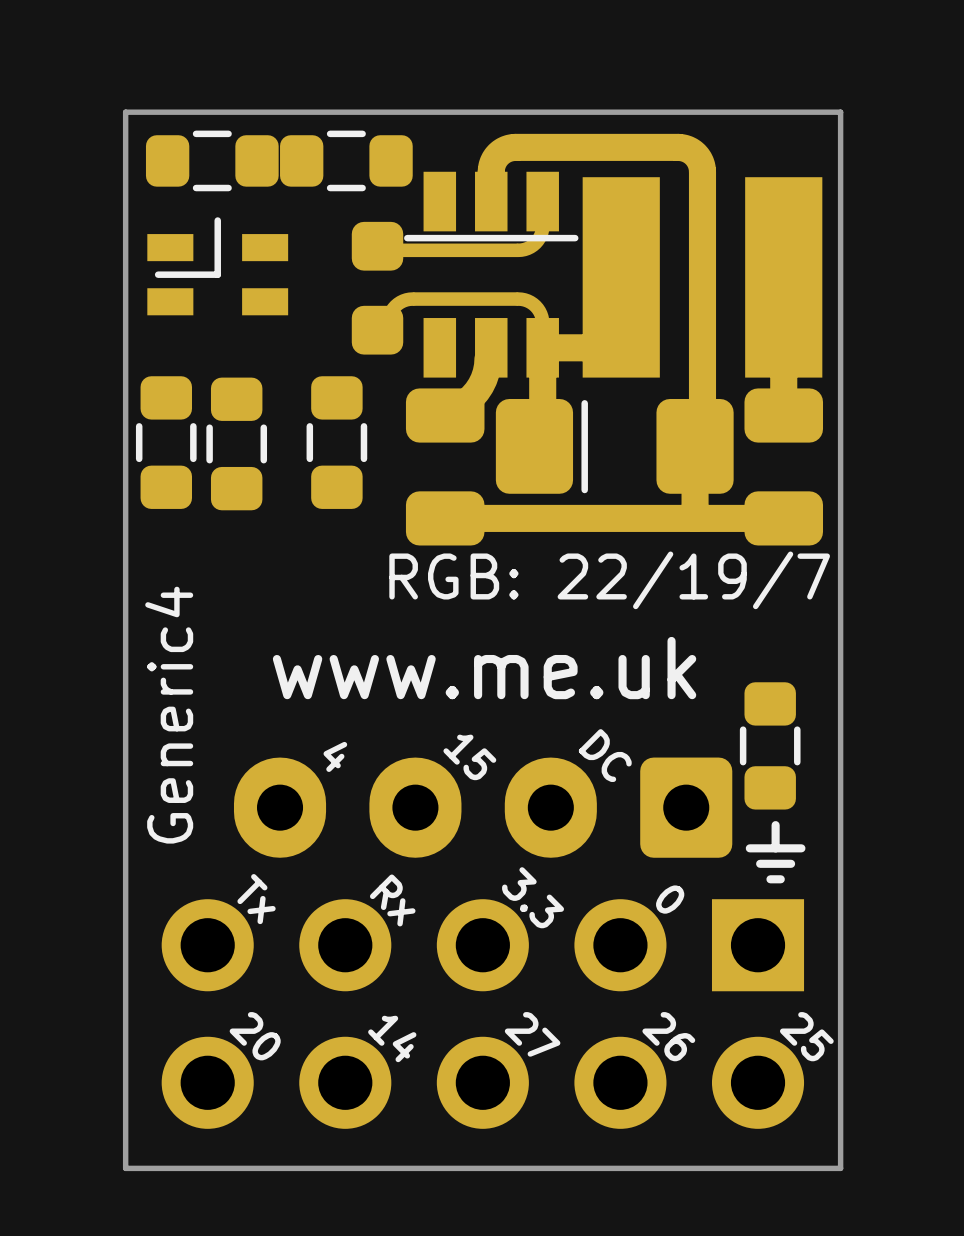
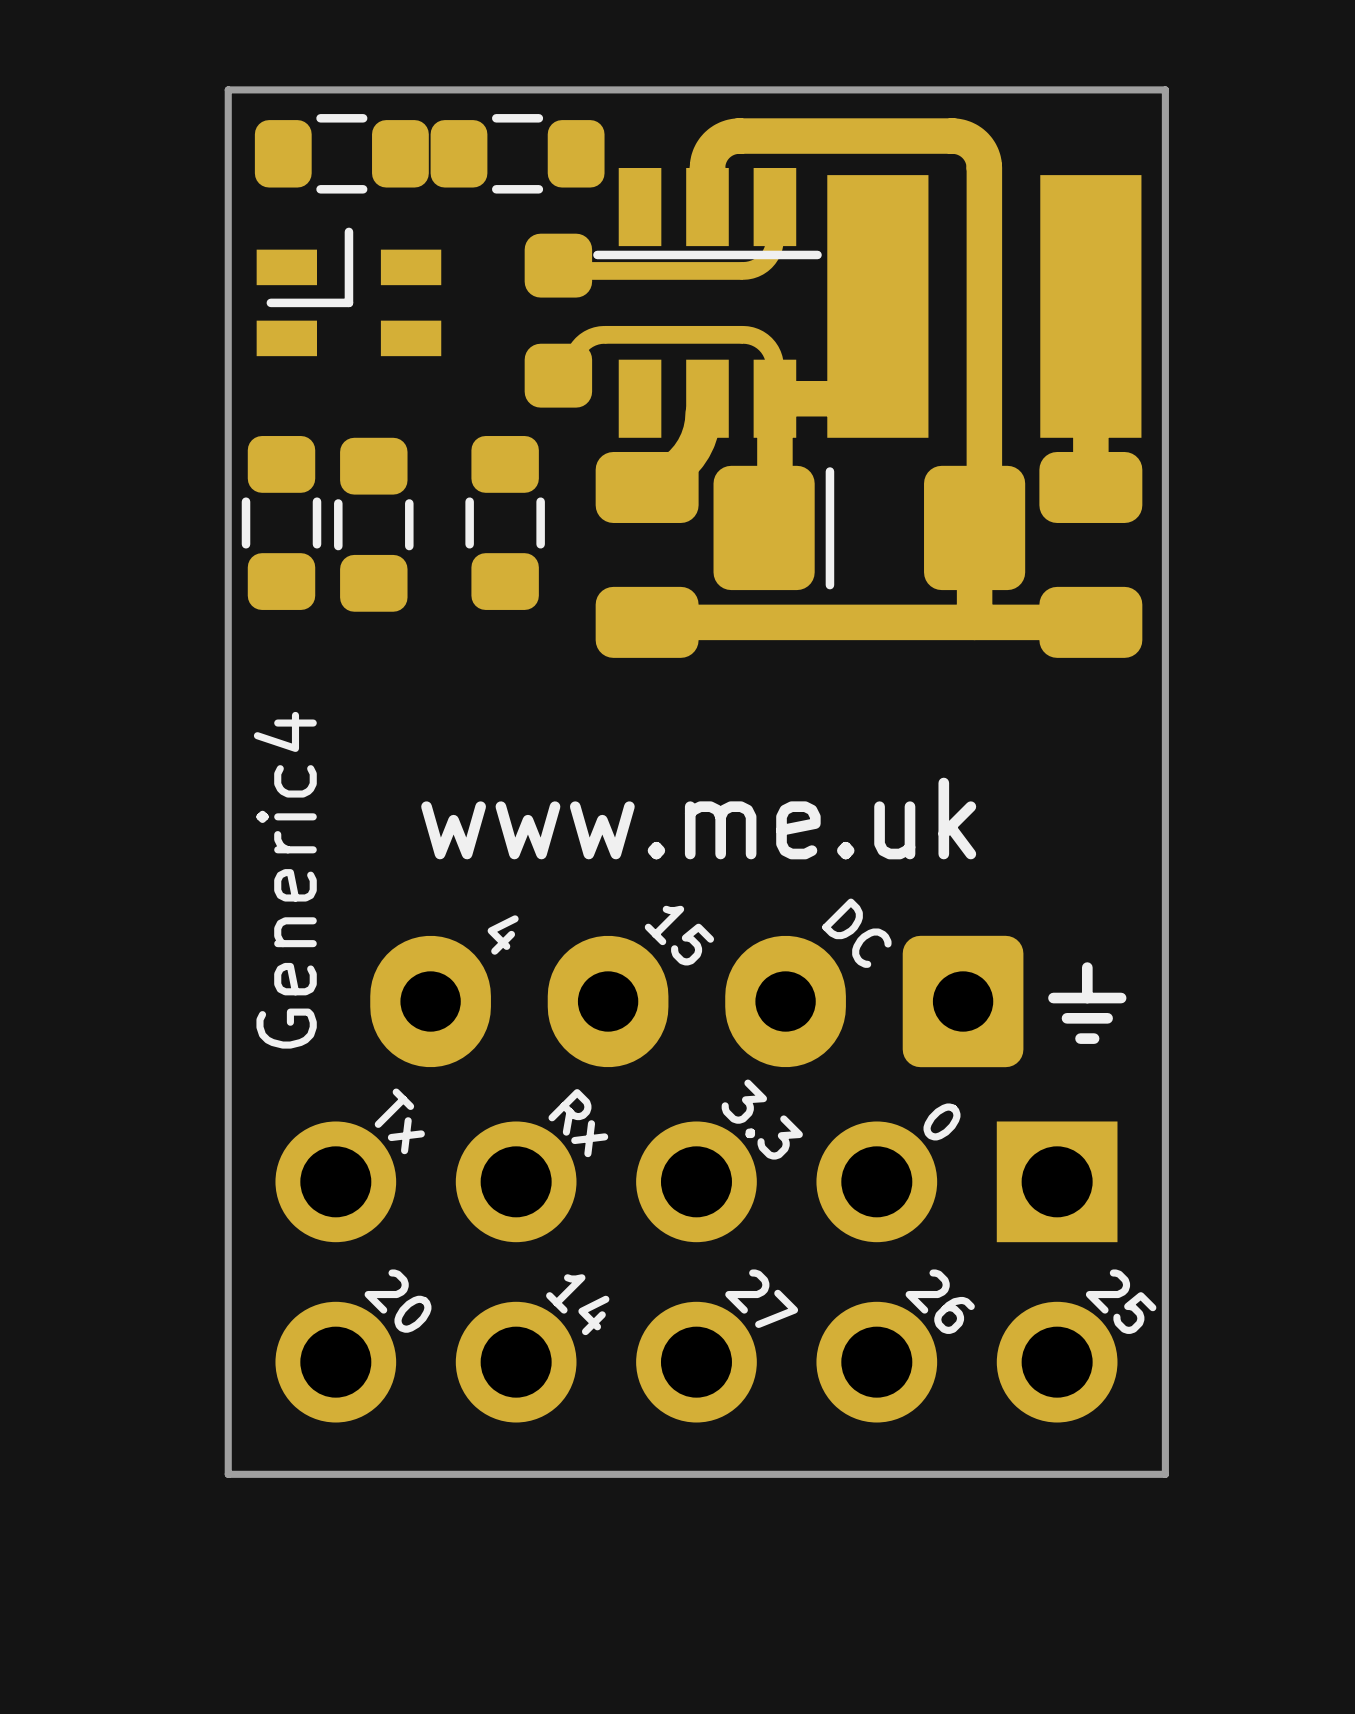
text: RGB: 22/19/7 (609, 580) -> none
part: (770, 745) -> none
text position: ⏚ (775, 852) -> ⏚ (1087, 1003)

